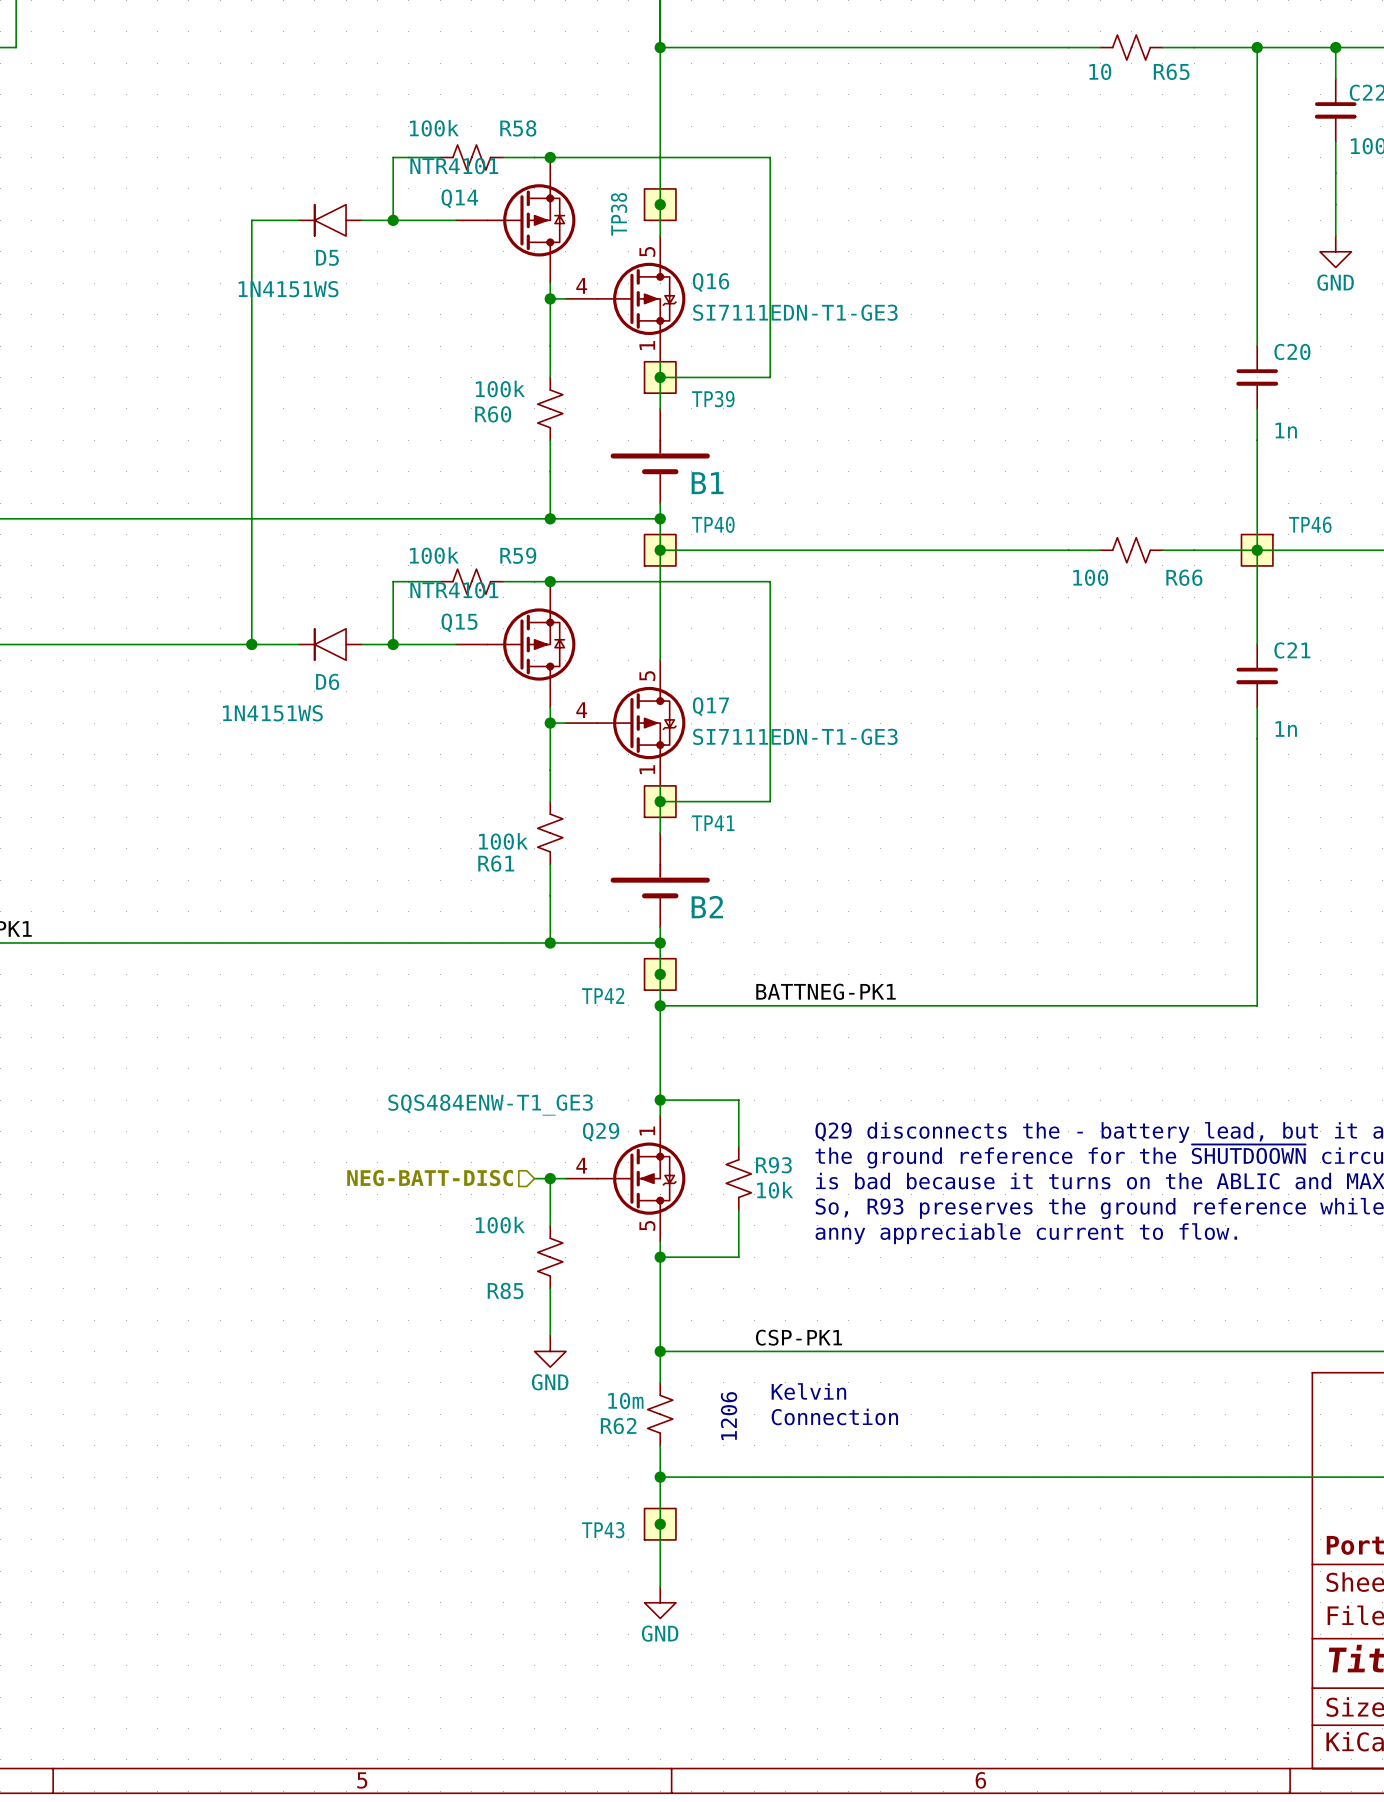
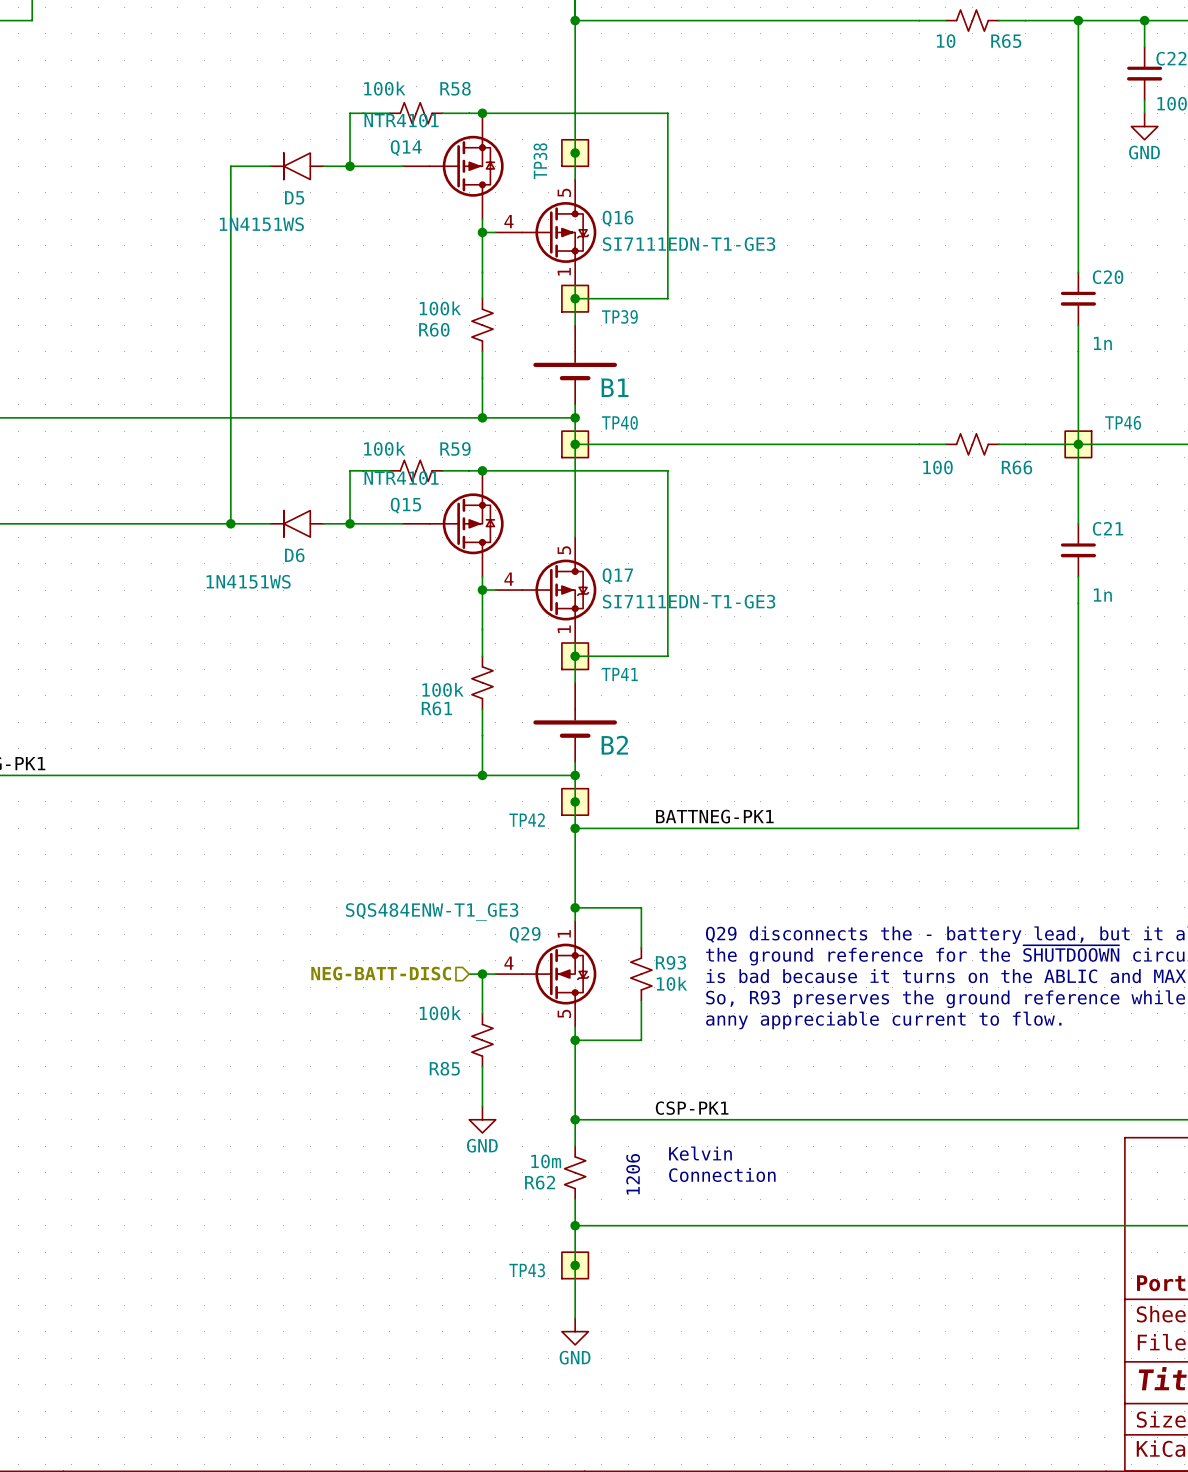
wire: (1335, 157) (1335, 236) -> none
power symbol position: GND (1335, 251) -> GND (1144, 126)

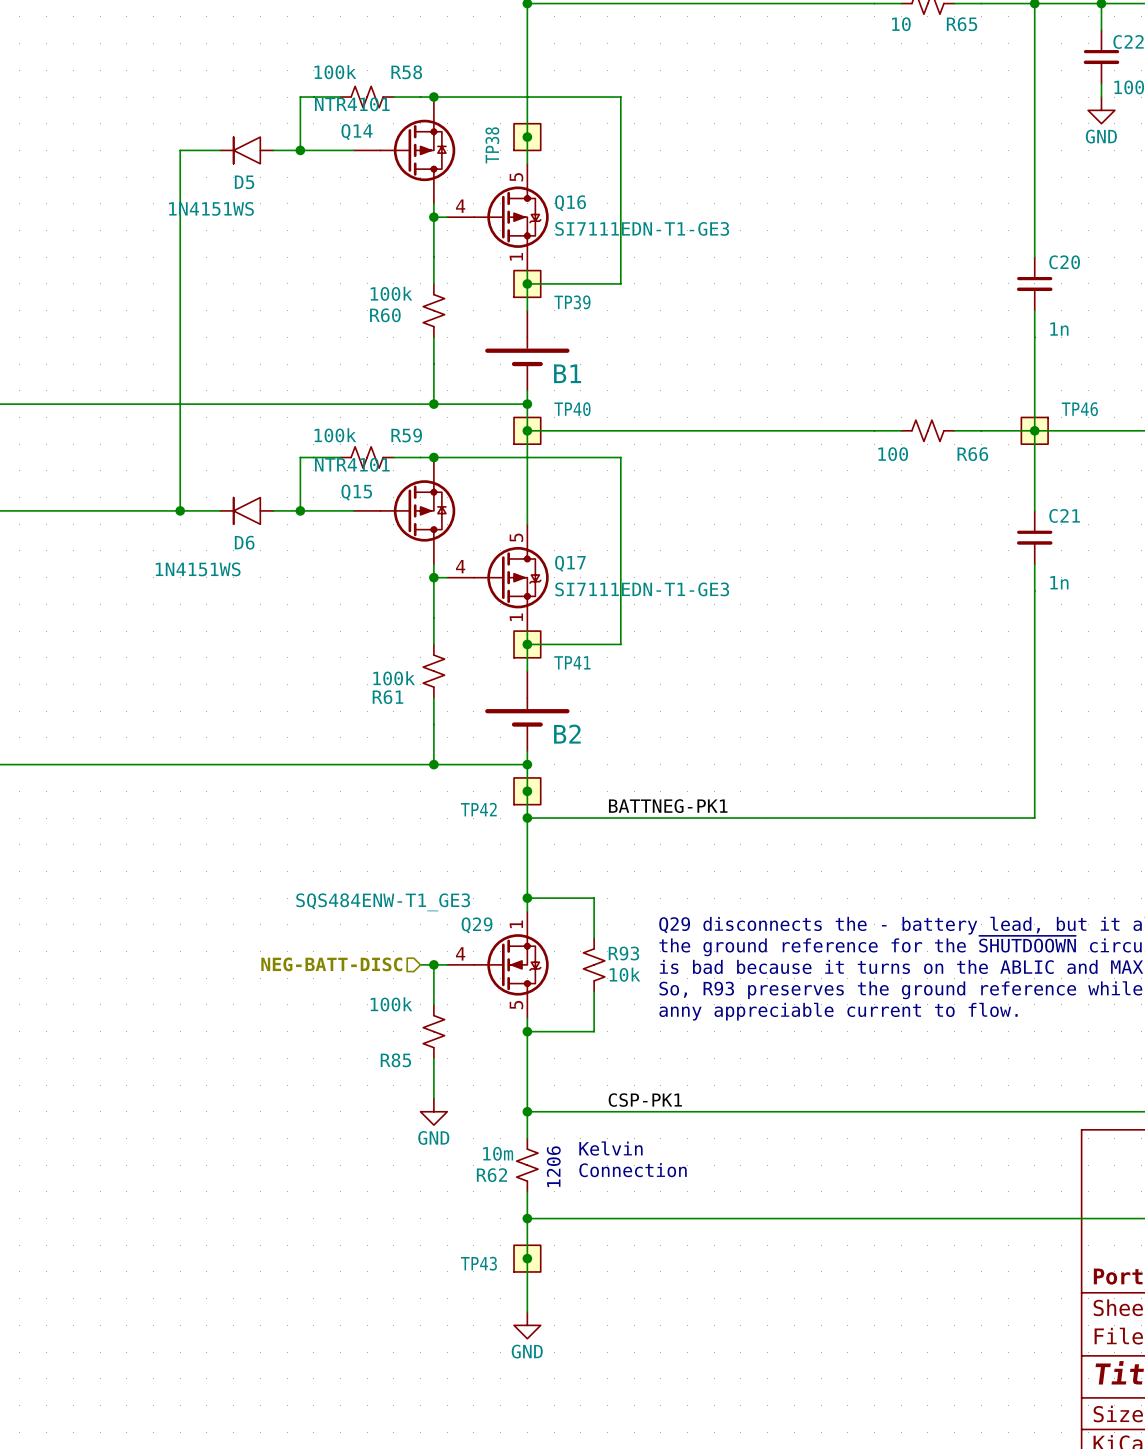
text position: Kelvin (700, 1153) -> Kelvin (610, 1148)
text position: 1206 (633, 1174) -> 1206 (553, 1166)
text position: Connection (722, 1174) -> Connection (633, 1170)

